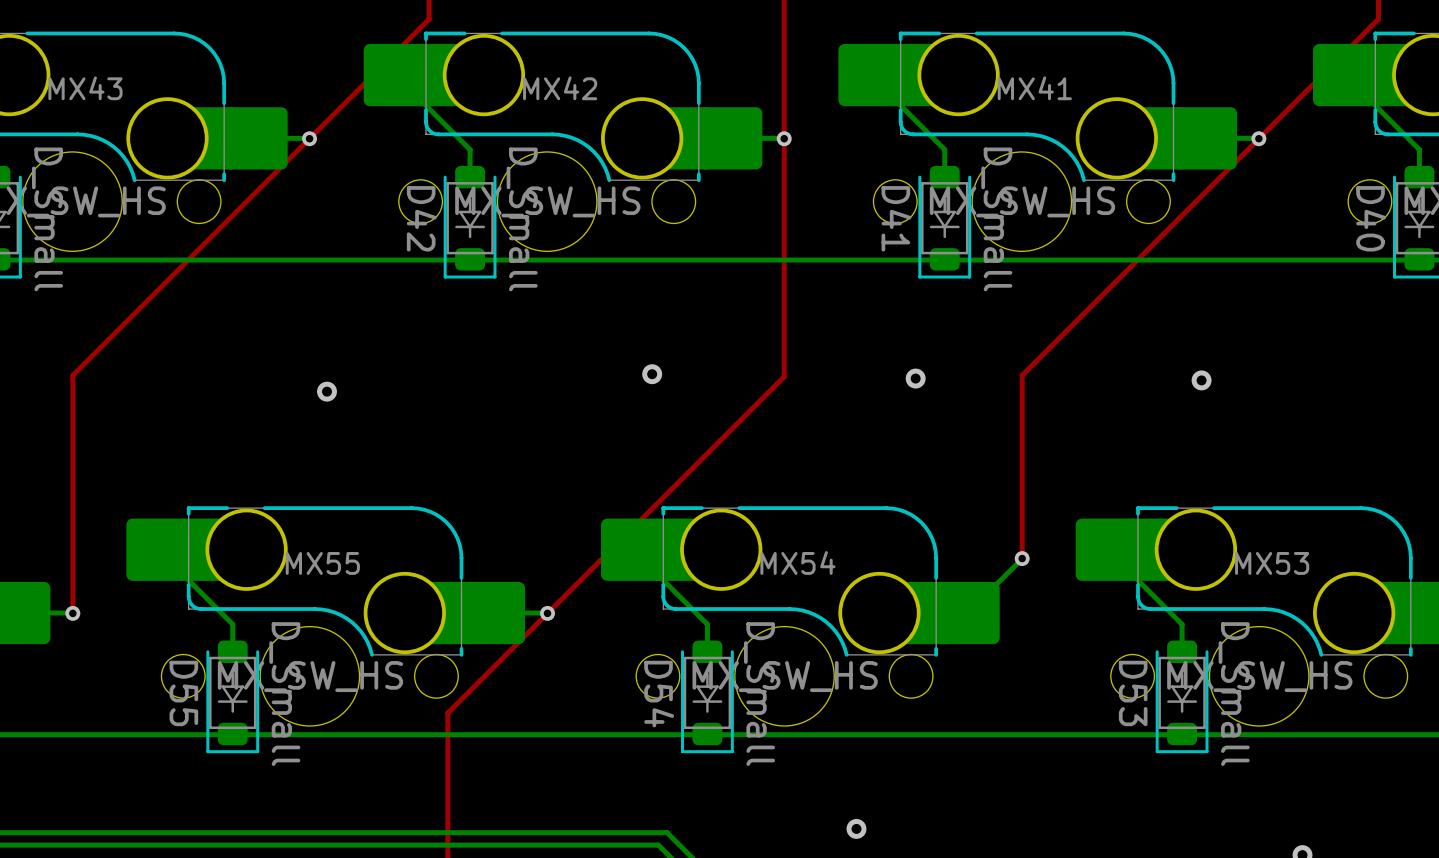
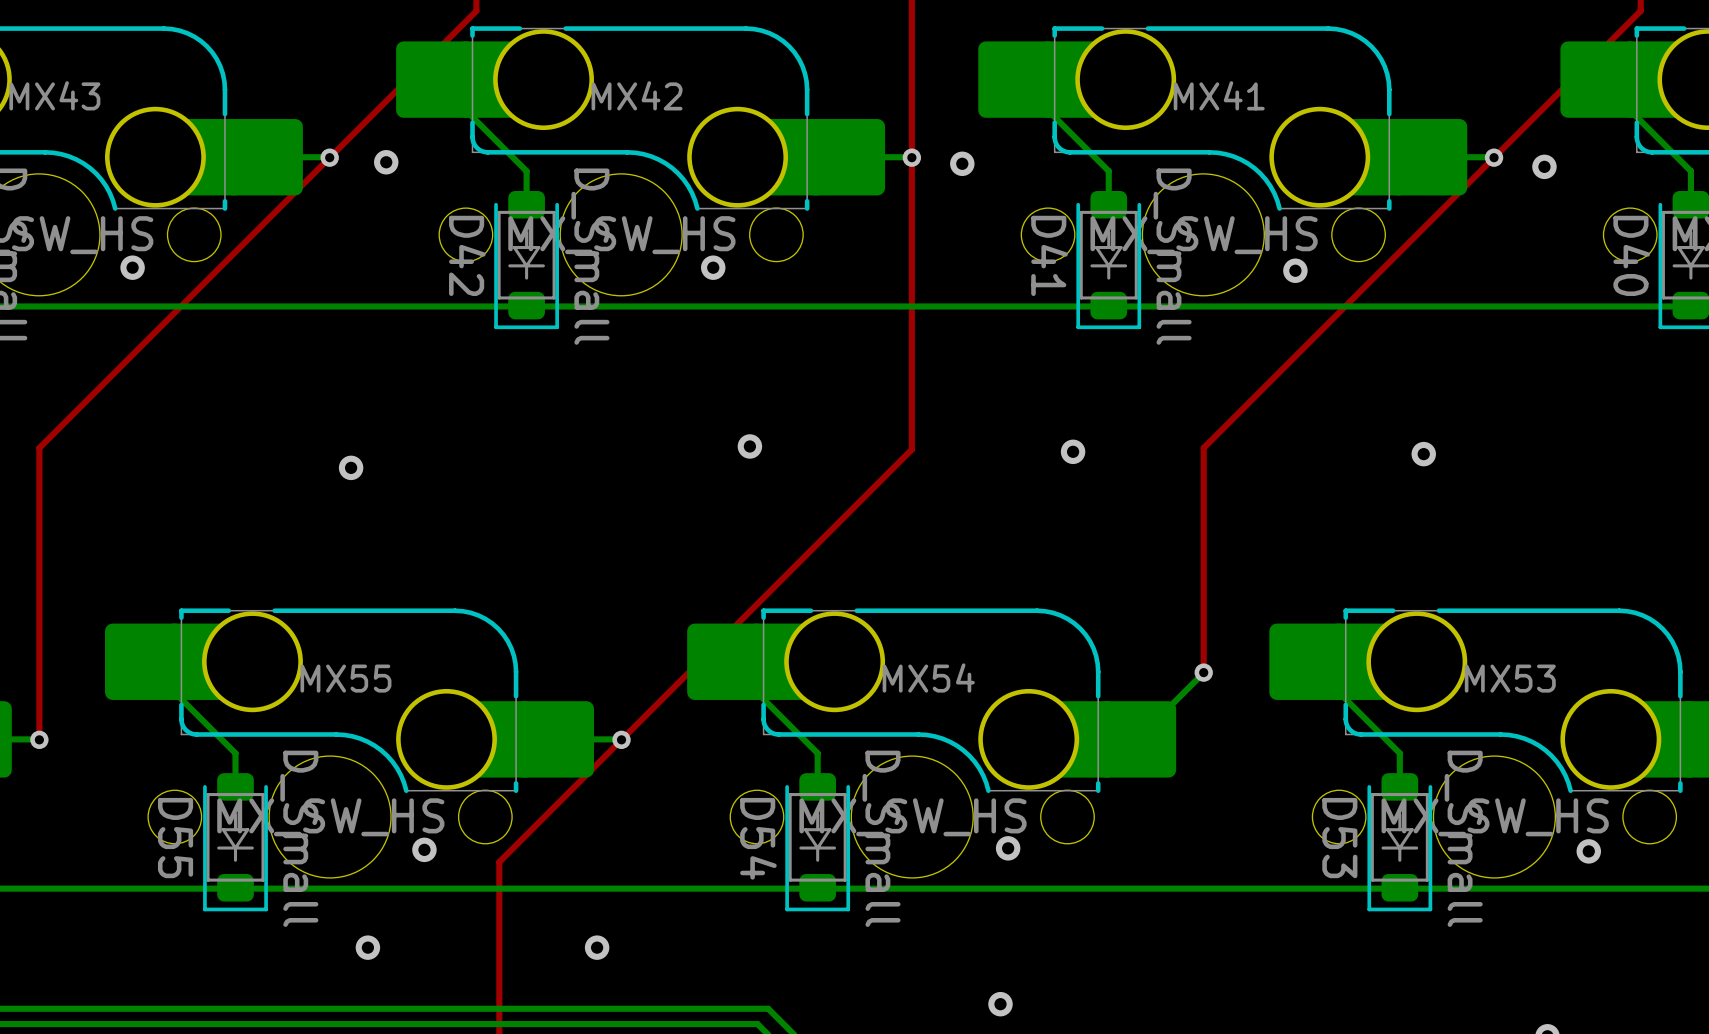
via: none -> (386, 162)
via: none -> (962, 163)
via: none -> (1544, 166)
via: none -> (132, 267)
via: none -> (713, 267)
via: none -> (1295, 270)
via: none -> (1008, 848)
via: none -> (424, 849)
via: none -> (1588, 851)
via: none -> (367, 947)
via: none -> (597, 947)

